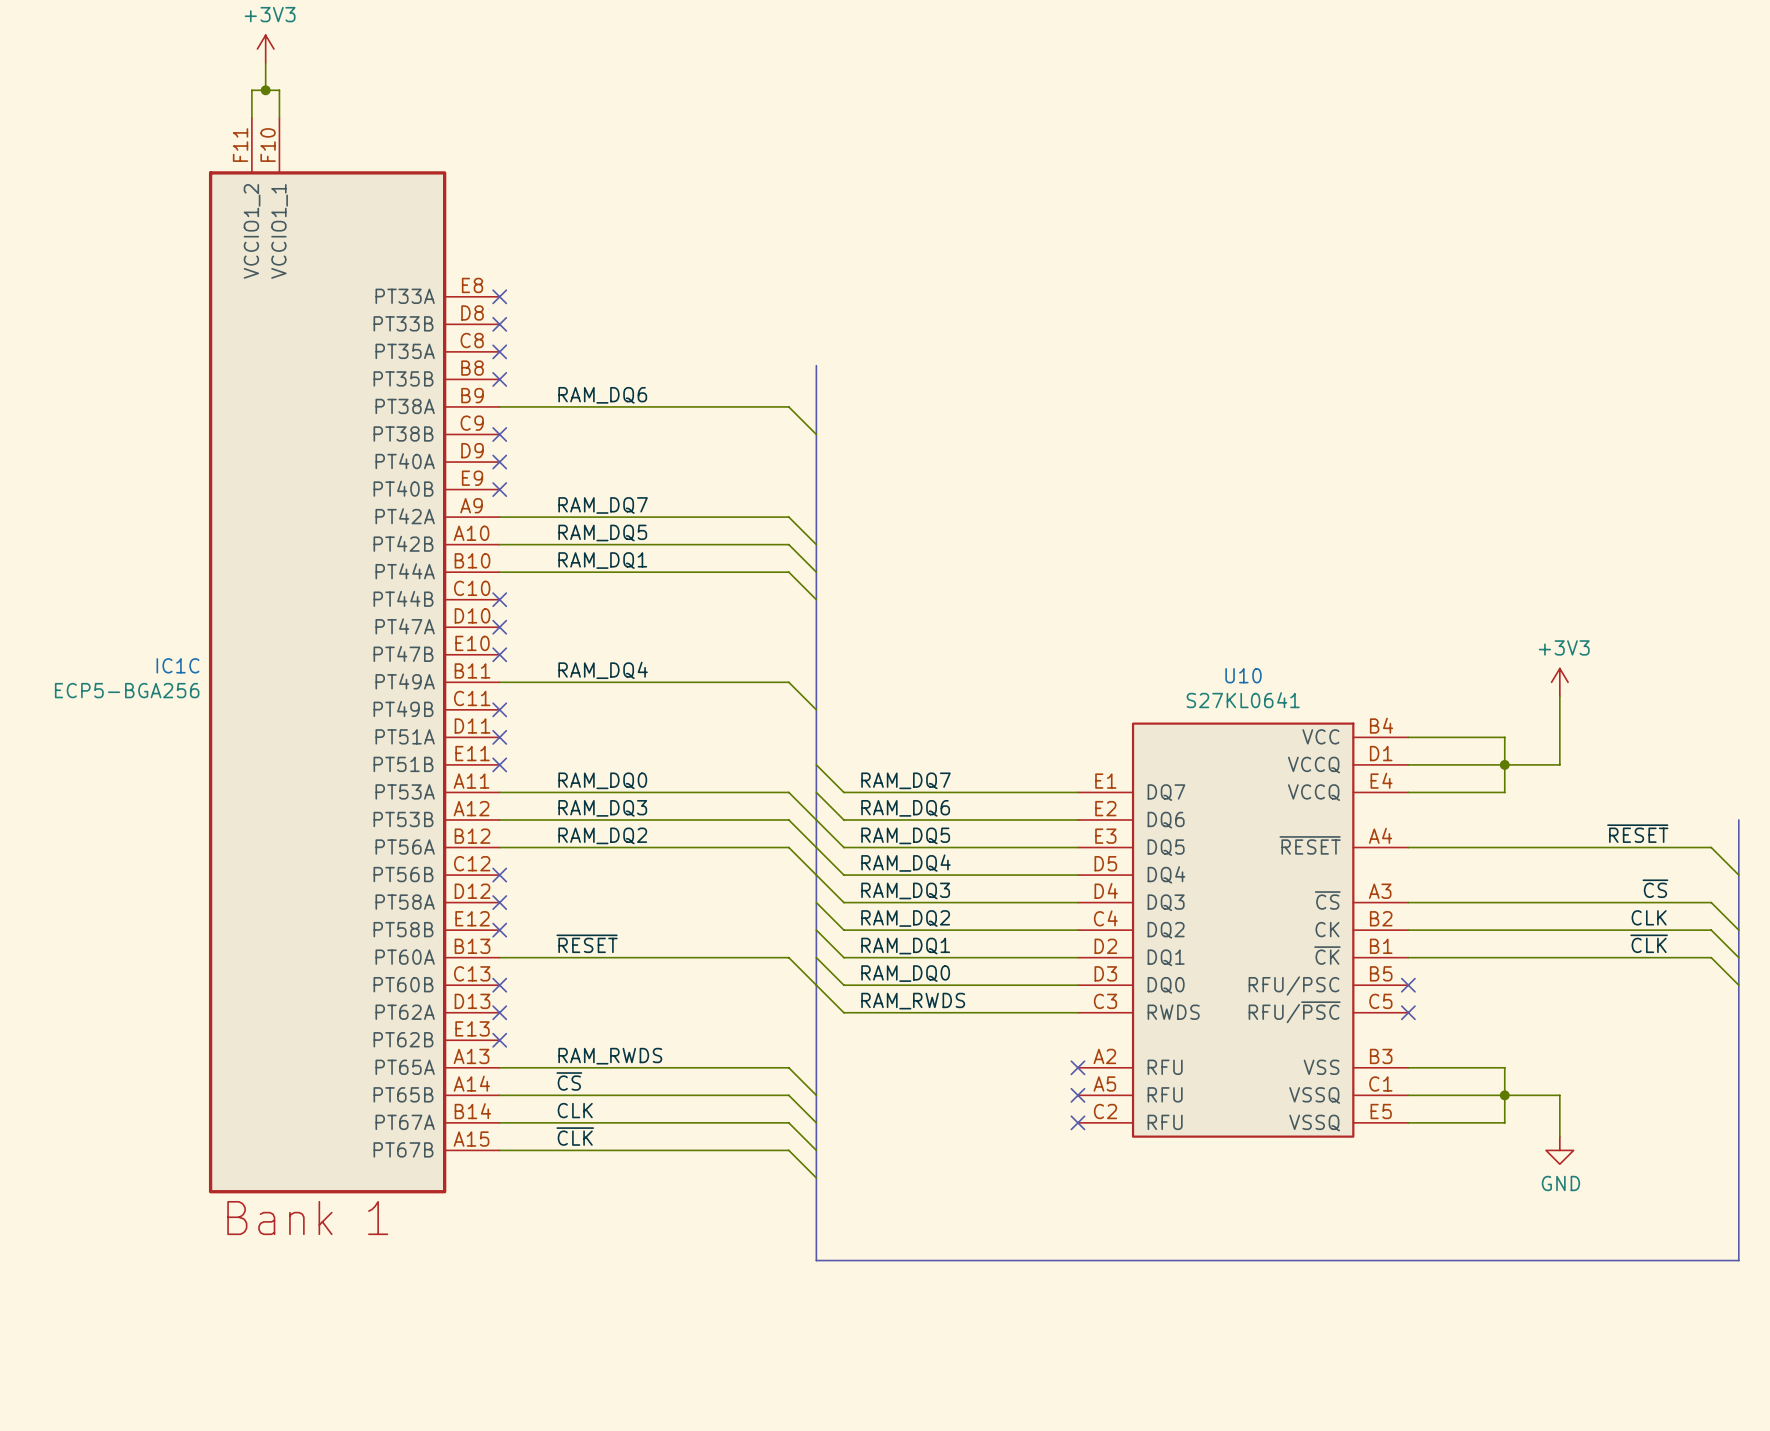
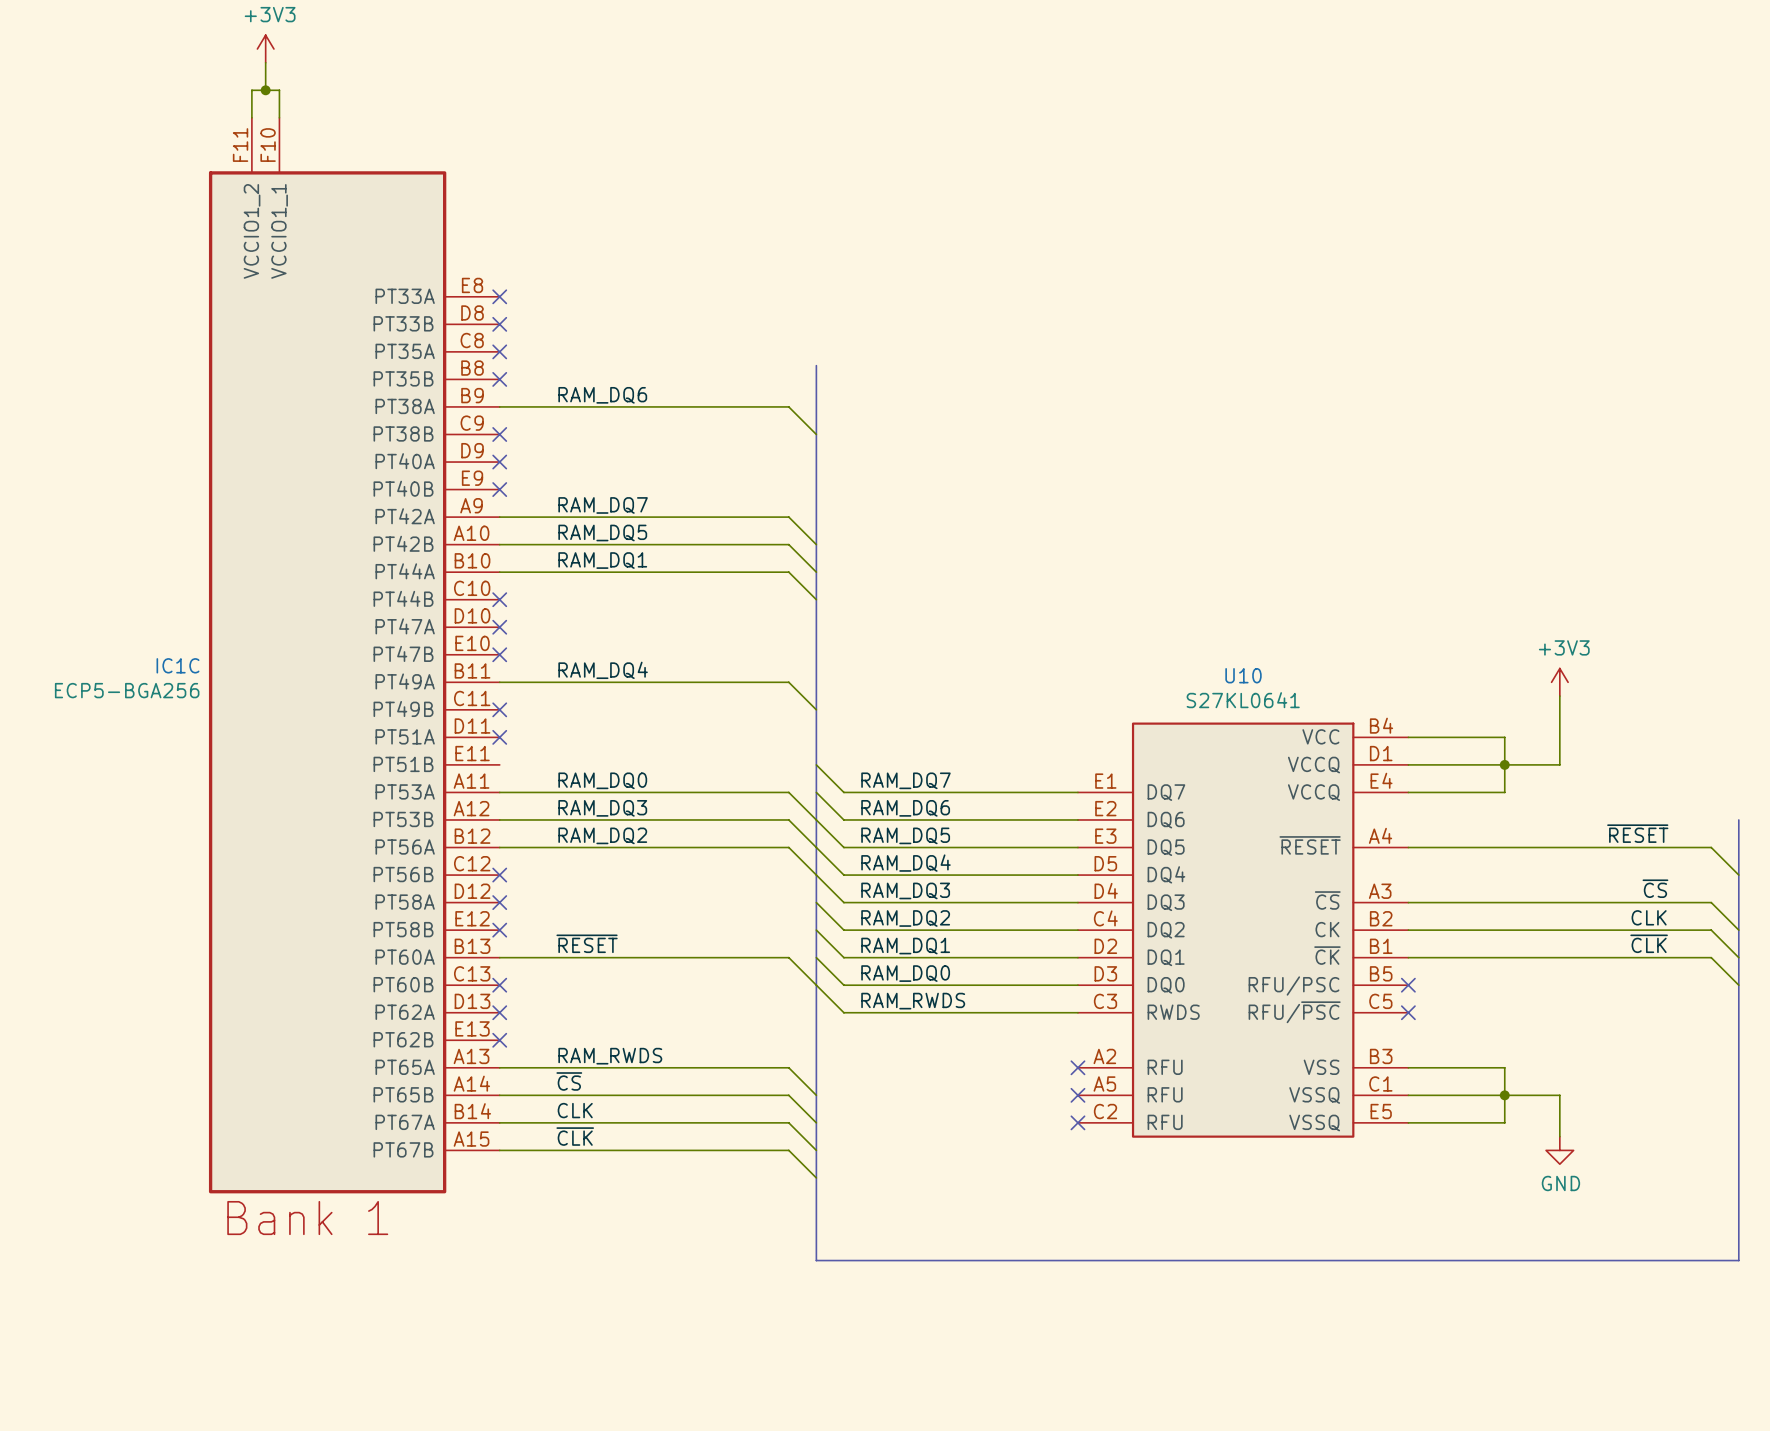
no-connect mark: (499, 764) -> none

